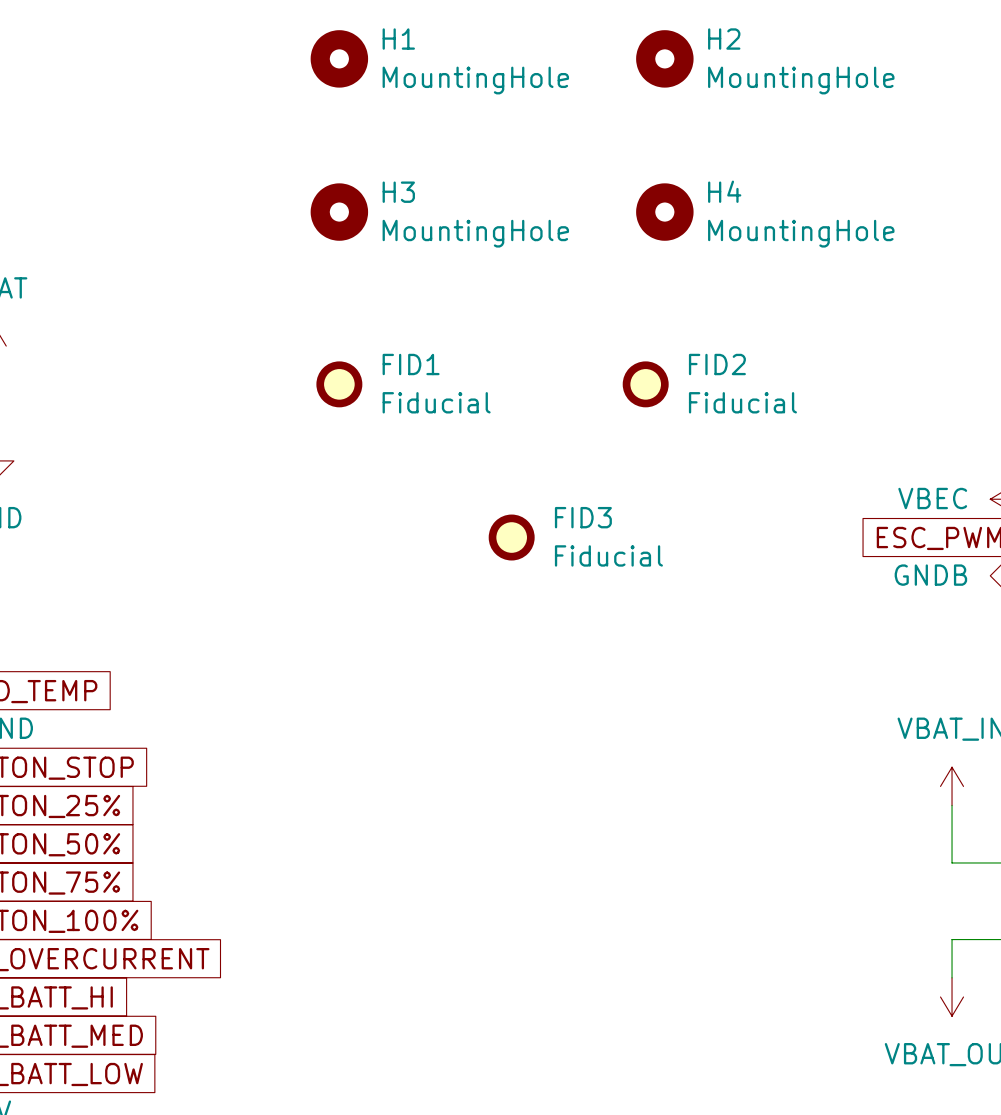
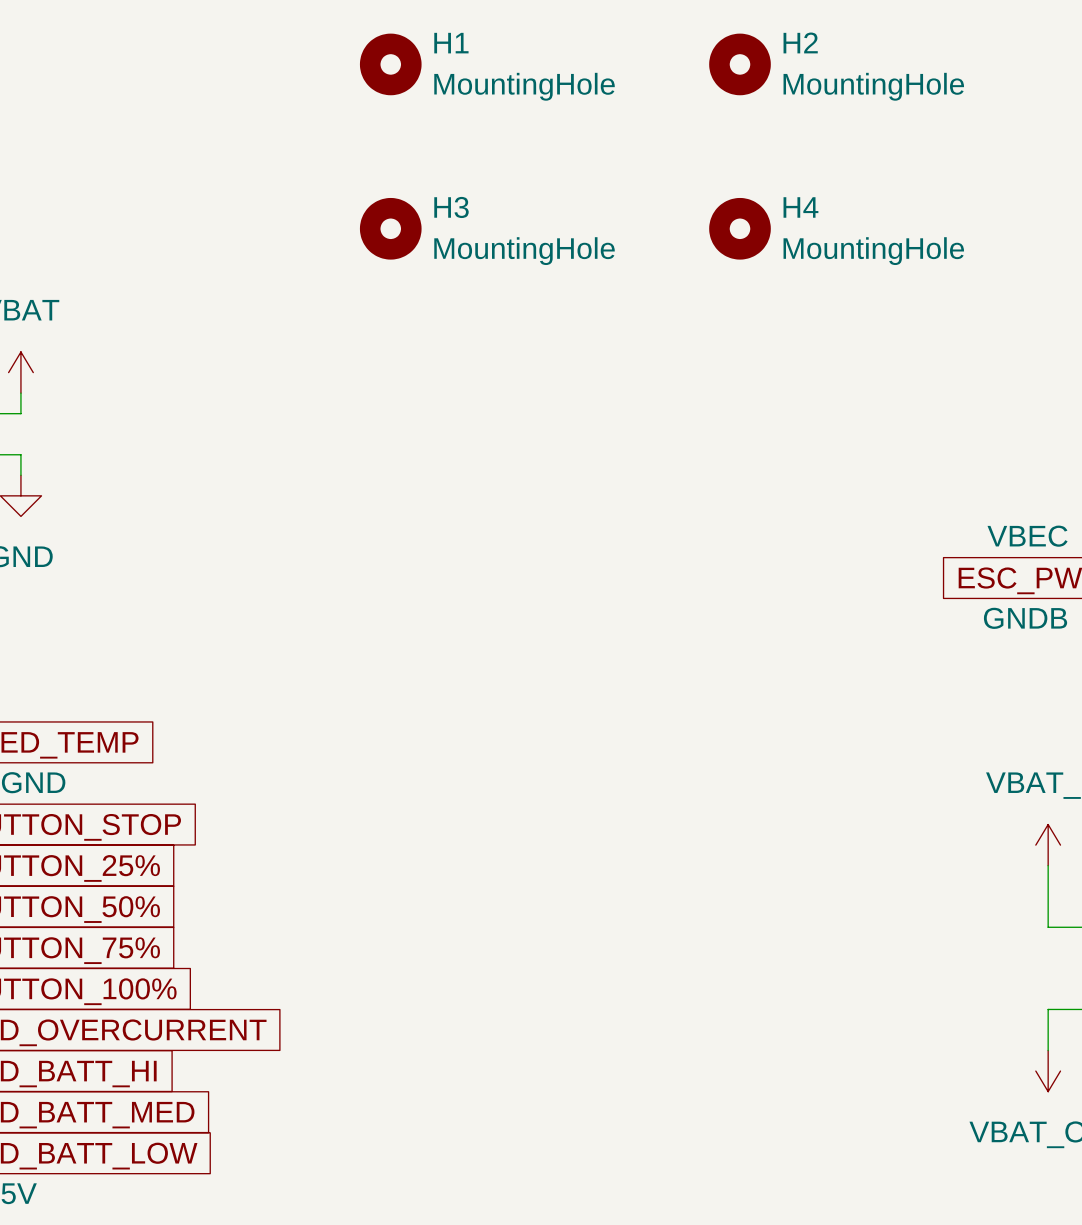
FID1: Fiducial (339, 384) -> none
FID2: Fiducial (645, 384) -> none
FID3: Fiducial (511, 537) -> none

